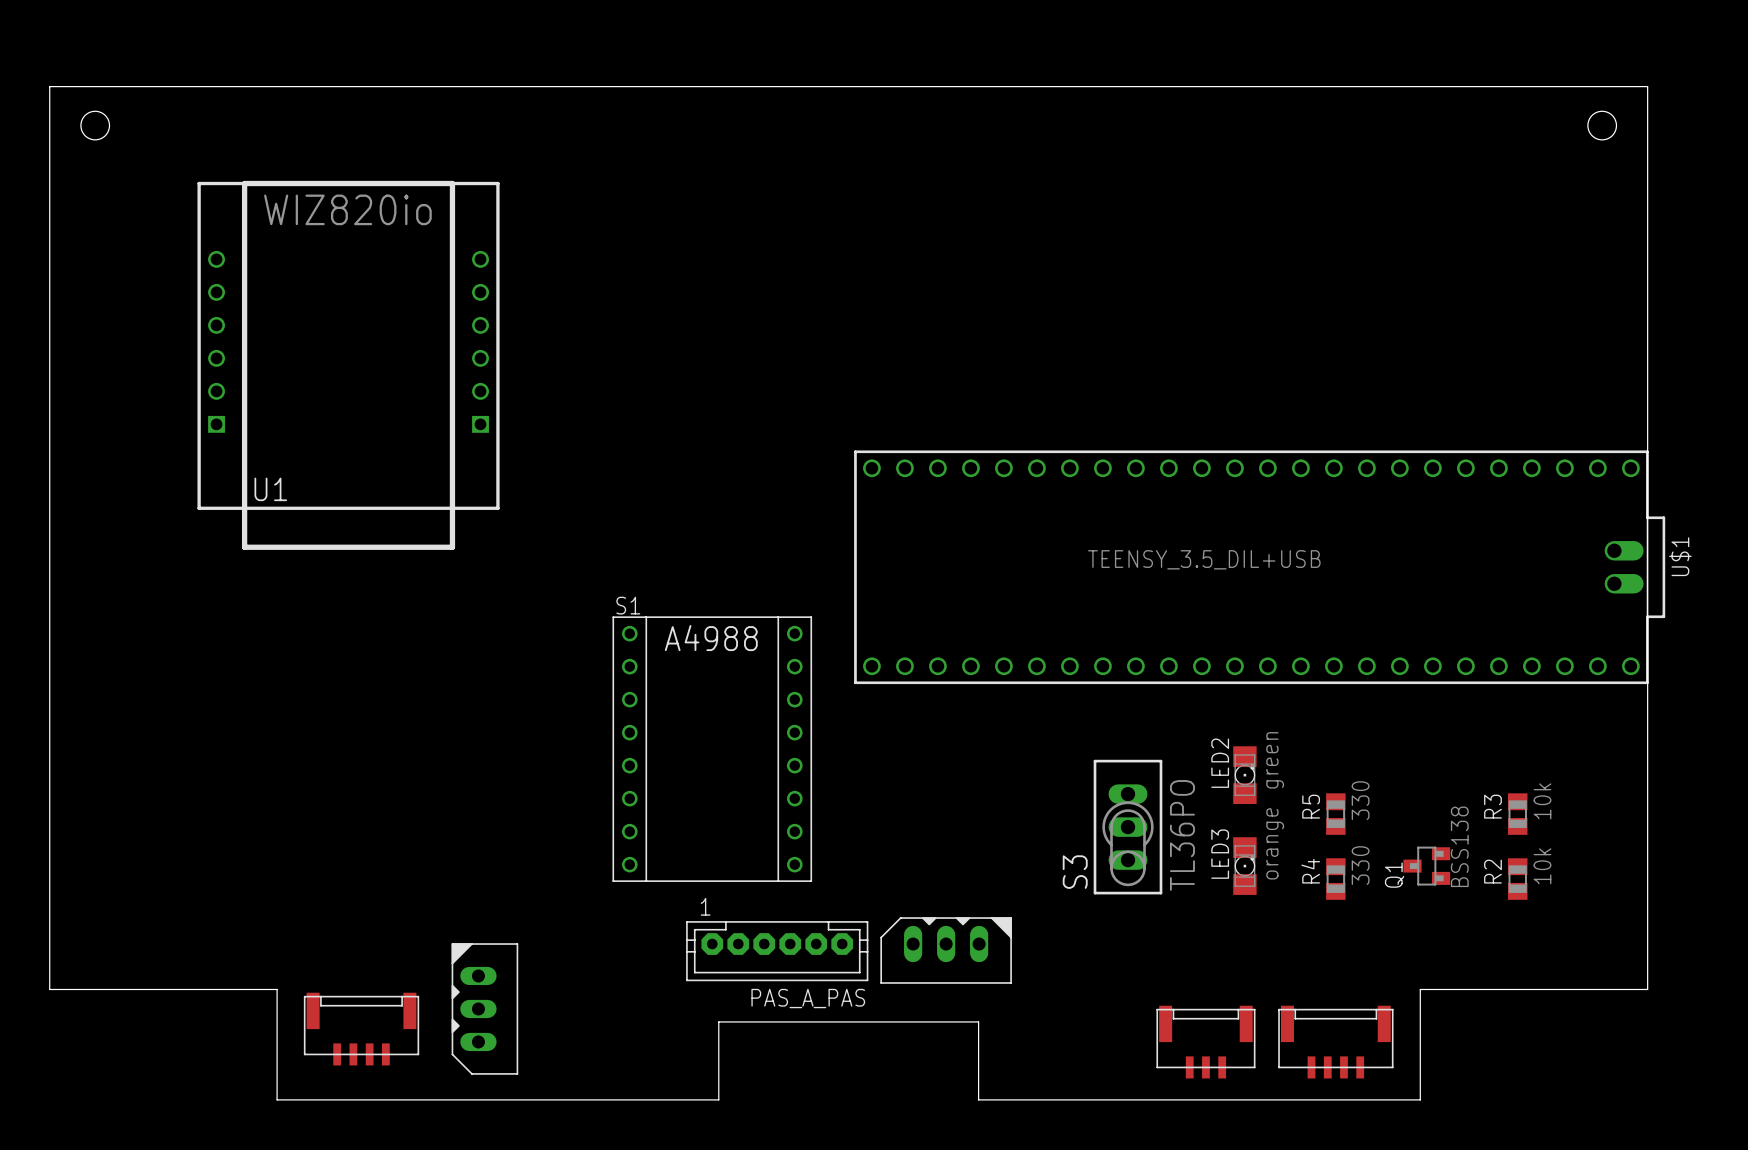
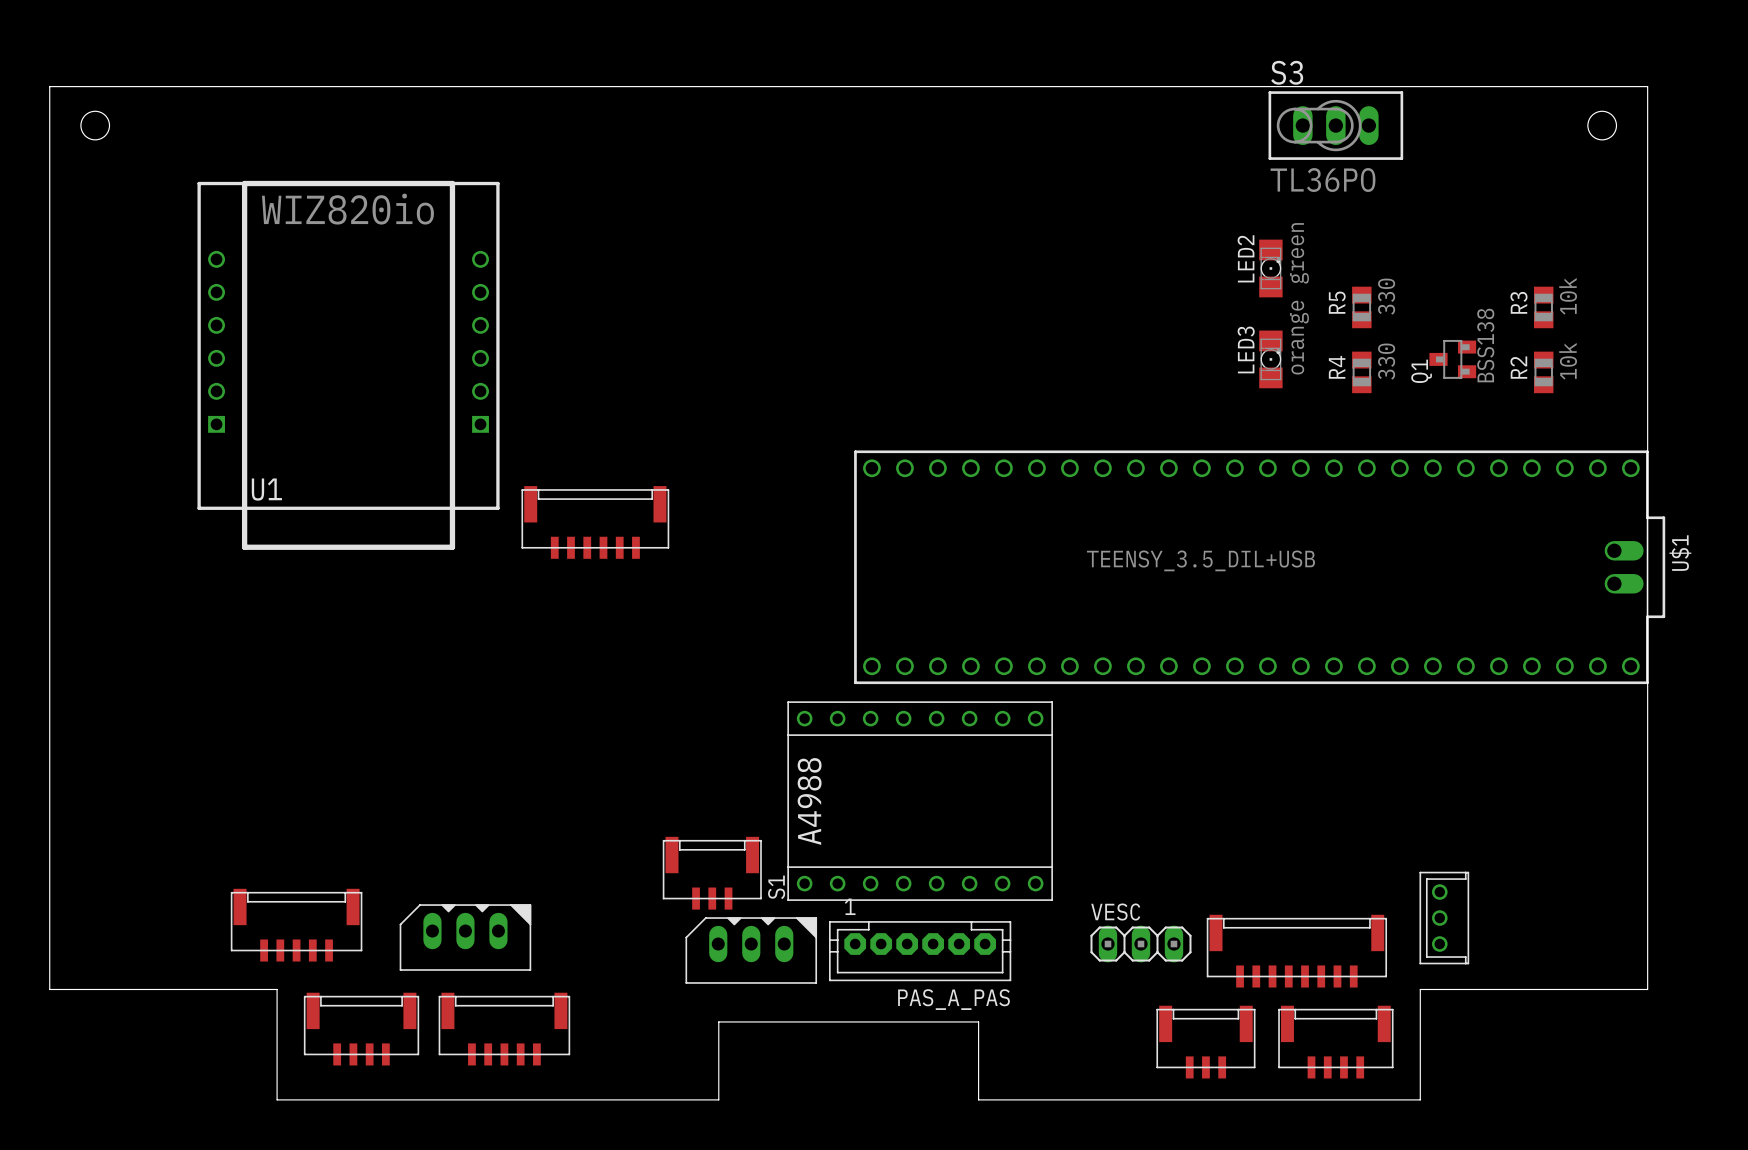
part: none -> (595, 522)
S1 rotation: 0° (712, 749) -> 90° counterclockwise (920, 801)
S1 position: (712, 749) -> (920, 801)
LED2 position: (1244, 775) -> (1270, 268)
R5 position: (1335, 814) -> (1361, 307)
R3 position: (1517, 814) -> (1543, 307)
S3 rotation: 0° (1128, 827) -> 90° clockwise (1335, 125)
S3 position: (1128, 827) -> (1335, 125)
LED3 position: (1244, 866) -> (1270, 359)
Q1 position: (1426, 866) -> (1452, 359)
part: none -> (712, 873)
R4 position: (1335, 879) -> (1361, 372)
R2 position: (1517, 879) -> (1543, 372)
part: none -> (1444, 918)
part: none -> (296, 925)
VESC: none -> (1140, 944)
part: none -> (751, 950)
part: (946, 950) -> none
PAS_A_PAS position: (777, 951) -> (920, 951)
part: none -> (1296, 951)
part rotation: 0° (484, 1008) -> 90° clockwise (465, 937)
part: none -> (504, 1029)

